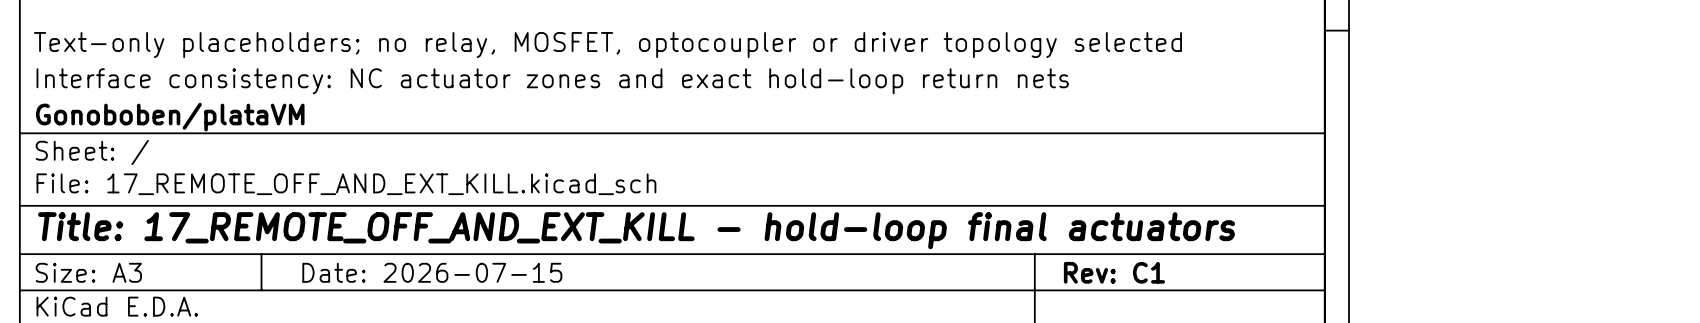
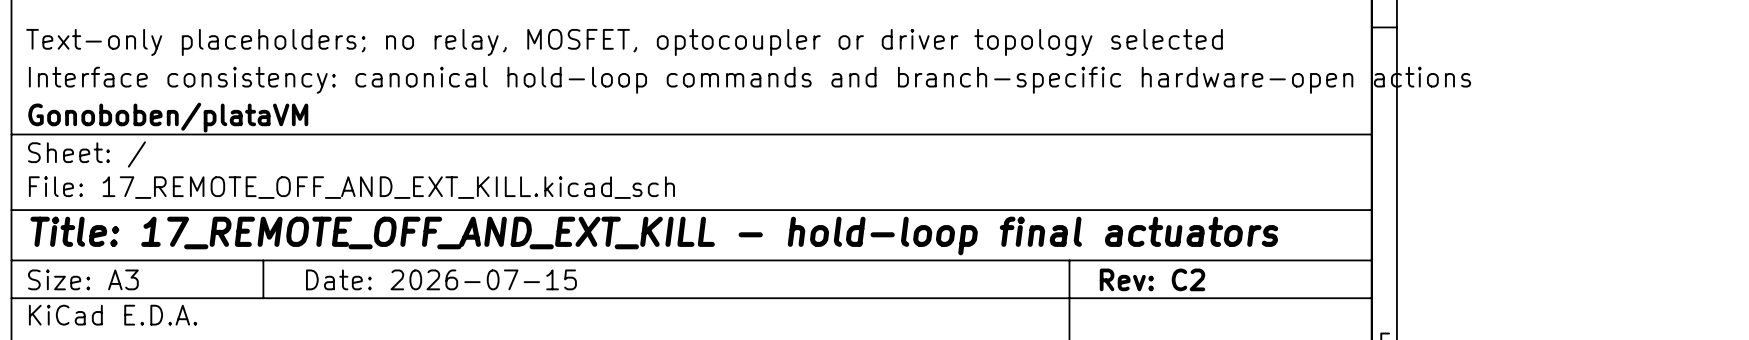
title block: Interface consistency: NC actuator zones and exact hold-loop return nets (552, 81) -> Interface consistency: canonical hold-loop commands and branch-specific hardware-open actions (750, 80)
title block: Rev: C1 (1114, 272) -> Rev: C2 (1152, 279)

